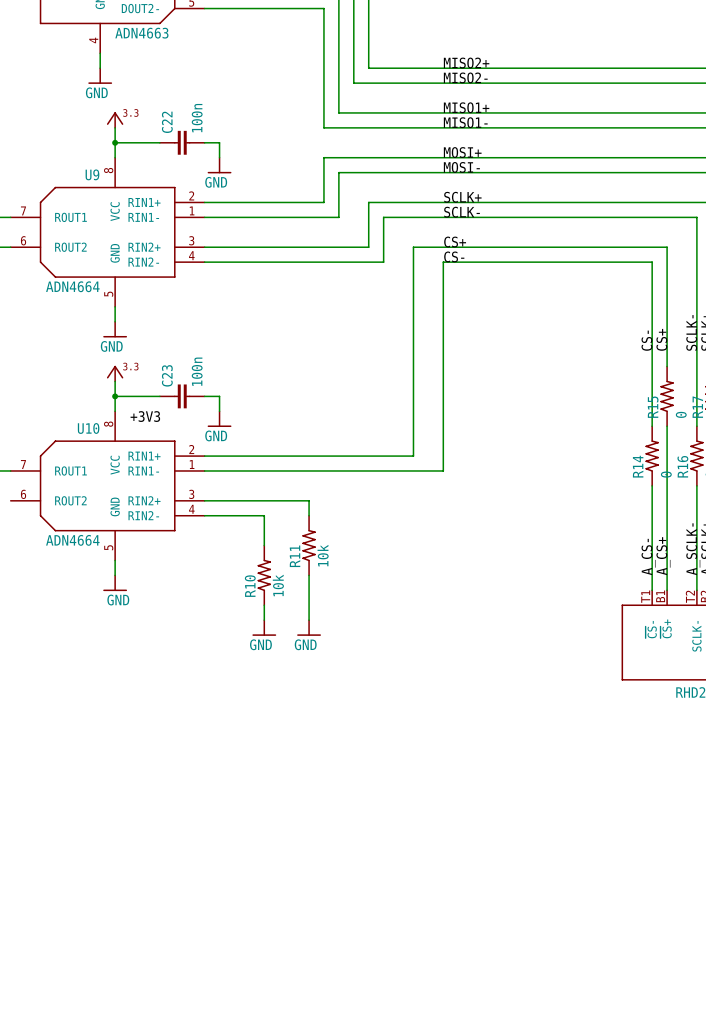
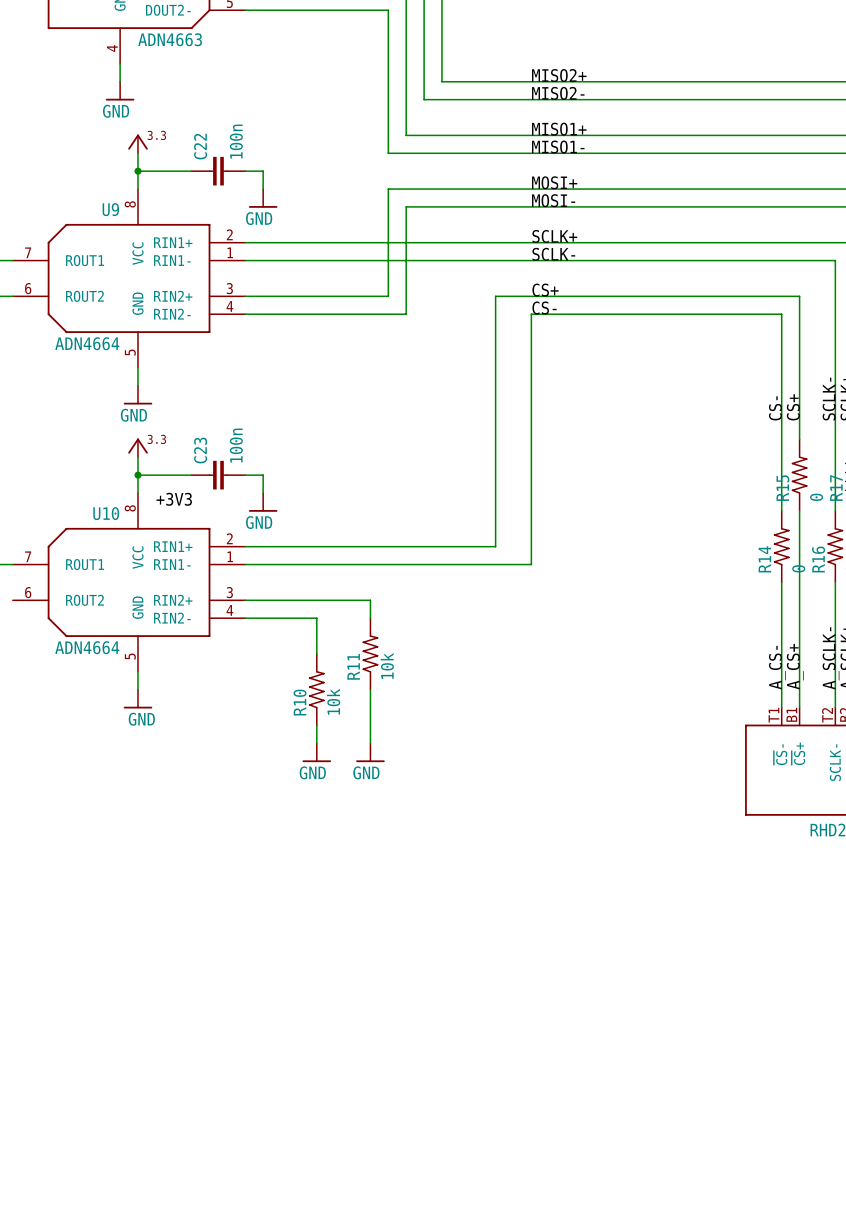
wire: (368, 202) (368, 247) (323, 247) -> (441, 242) (388, 242) (388, 296)
wire: (383, 217) (383, 262) (338, 262) -> (459, 260) (406, 260) (406, 314)

